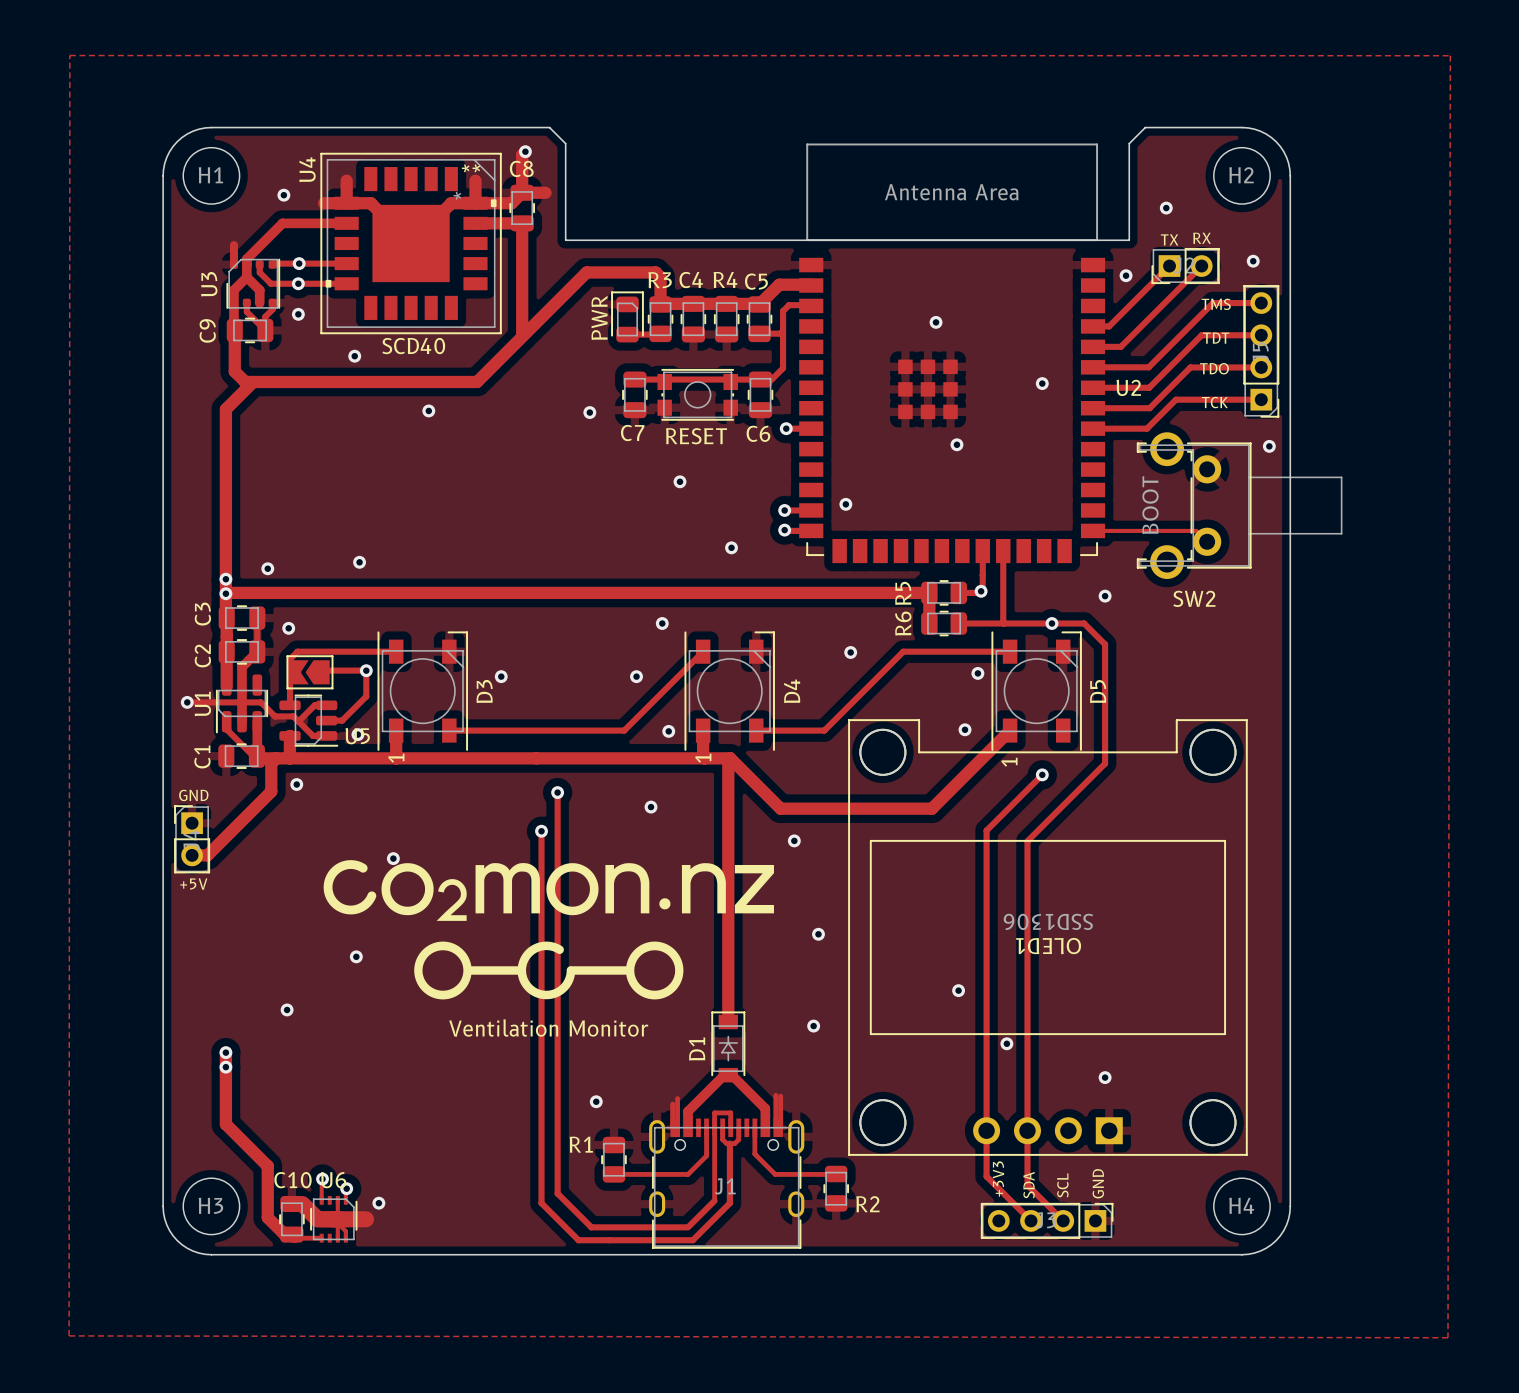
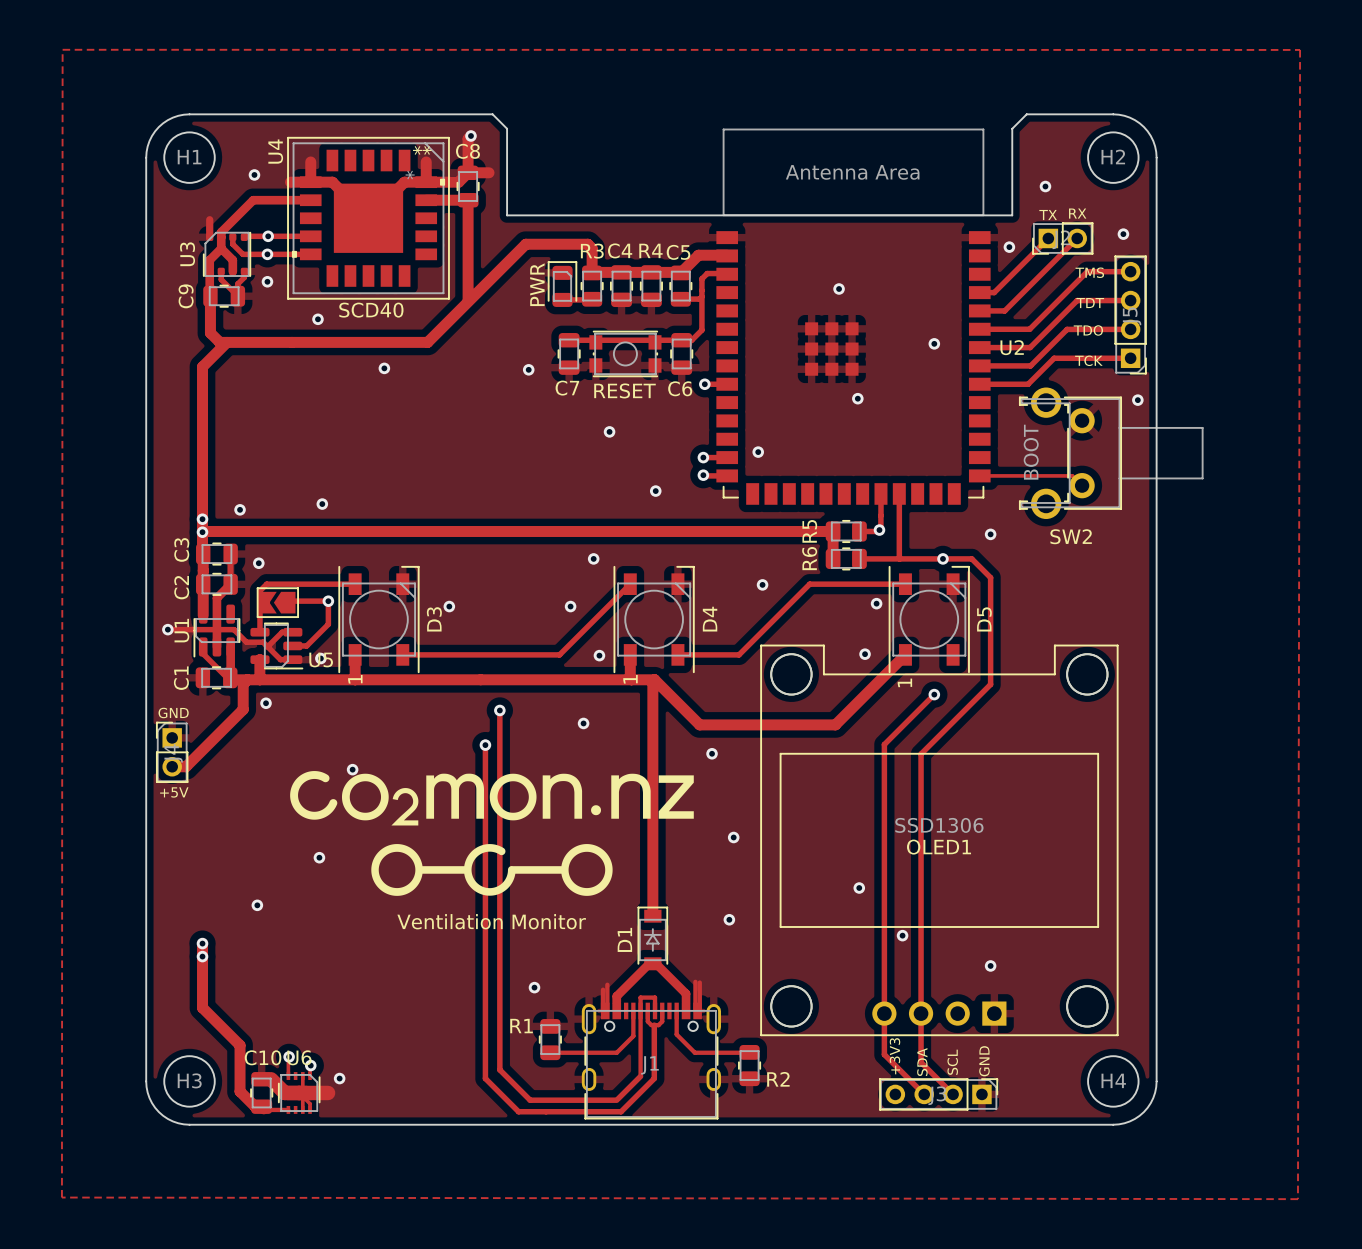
OLED1 value rotation: 0° (1048, 921) -> 180° (939, 825)
OLED1 name rotation: 0° (1048, 946) -> 180° (939, 847)

